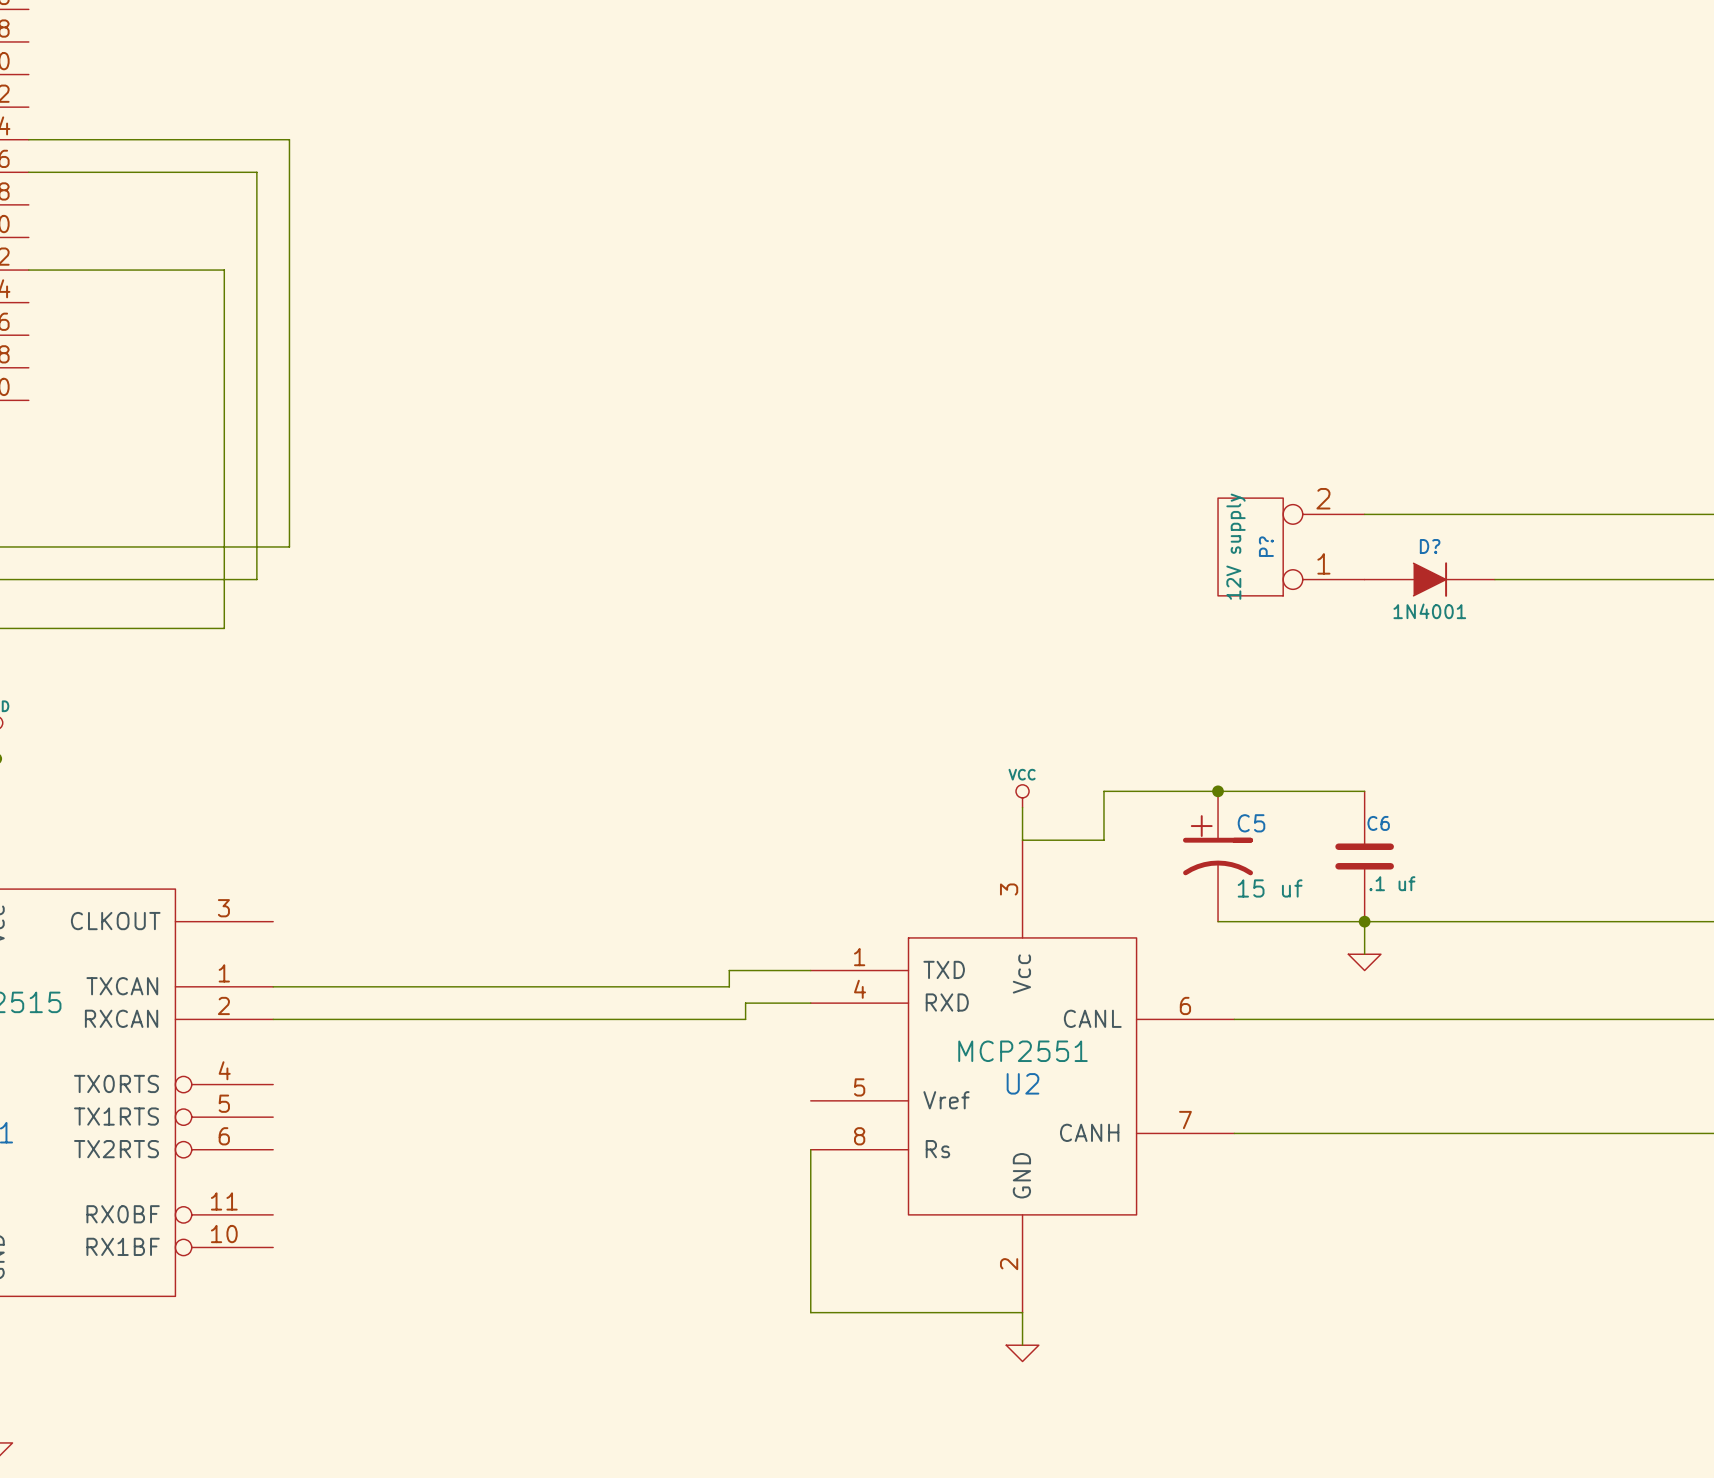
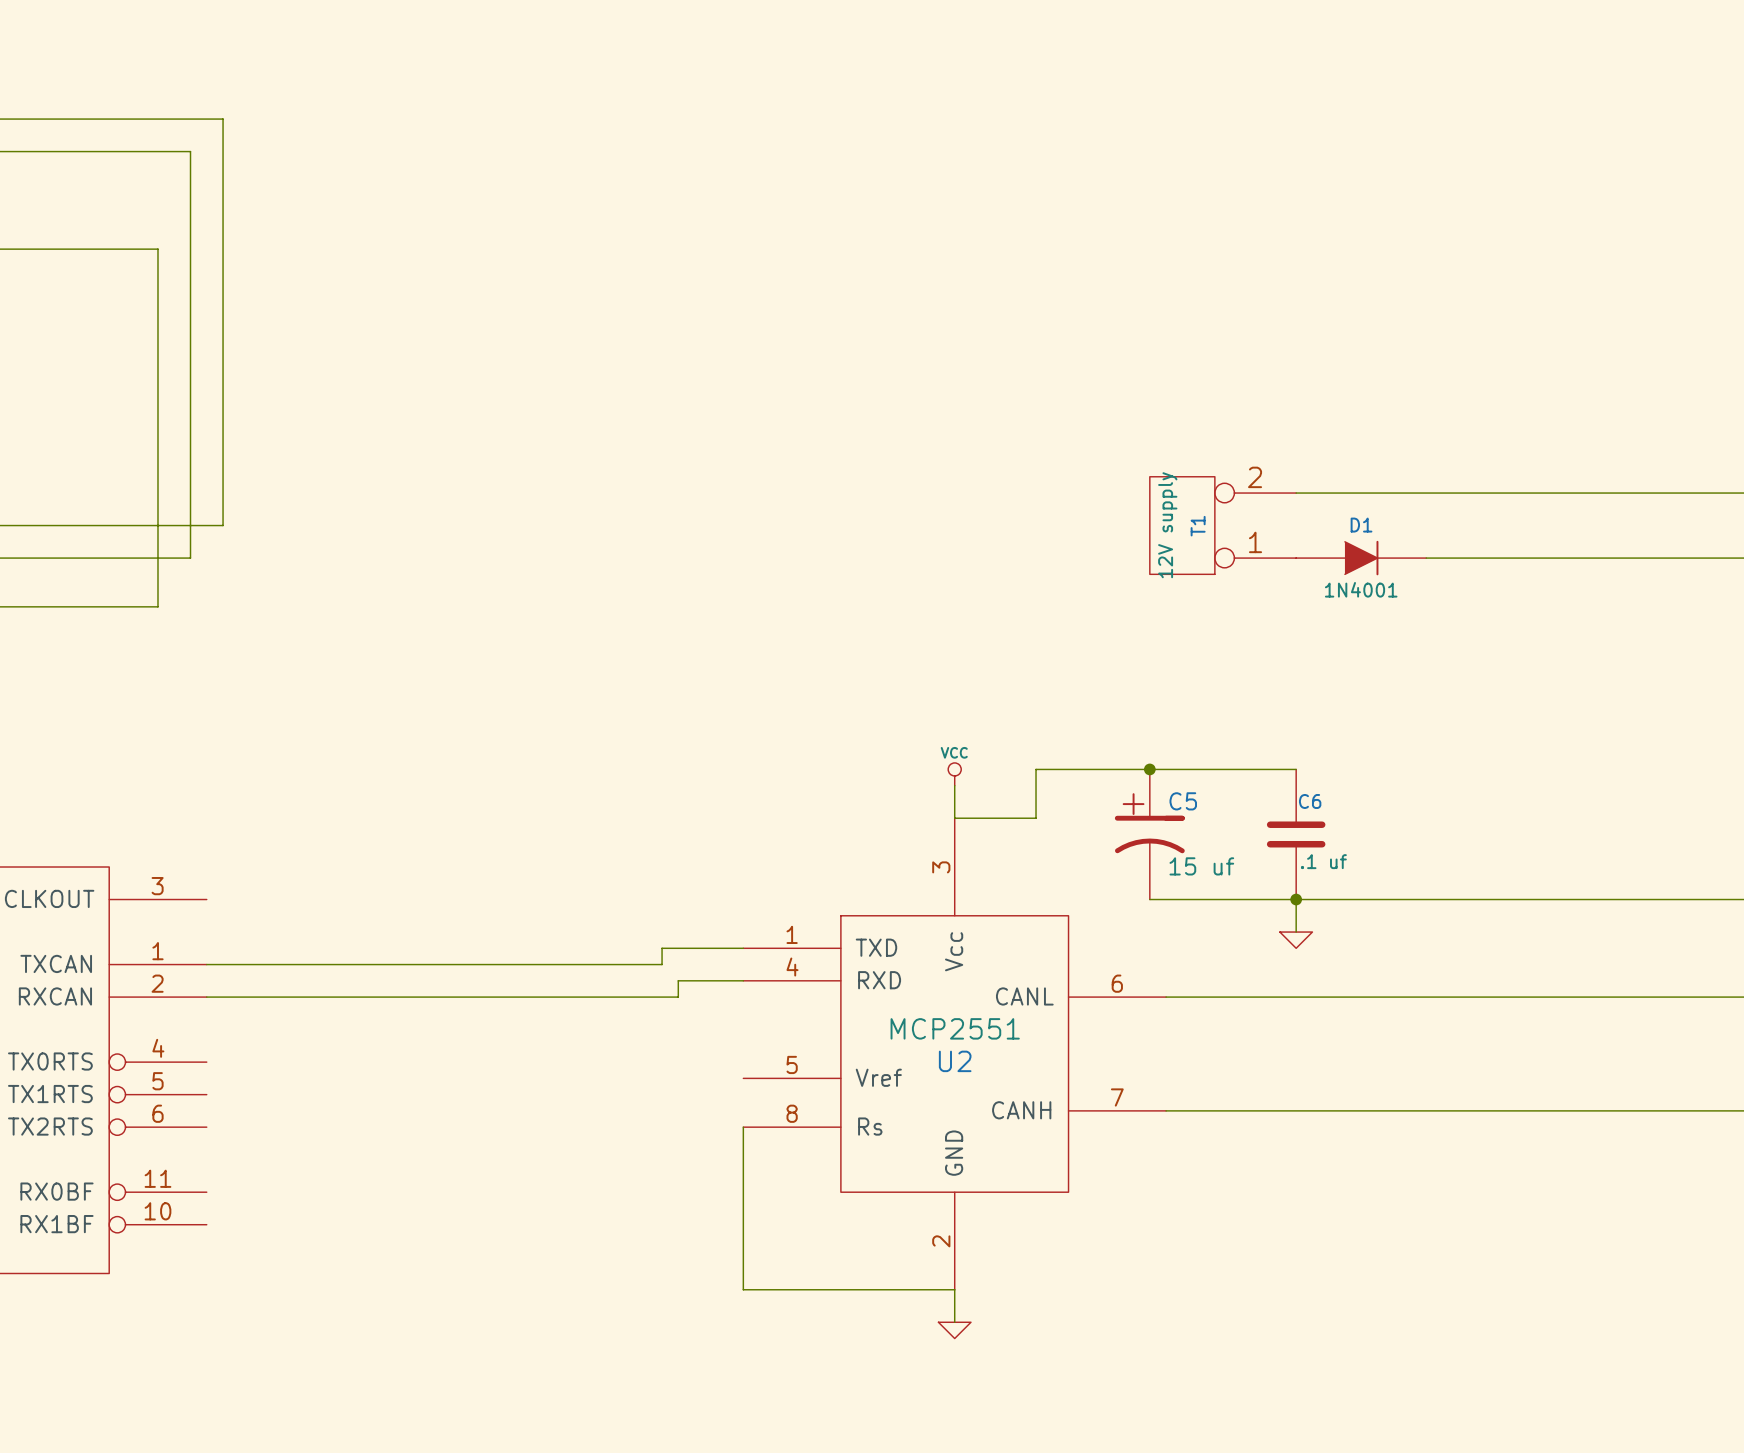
P? name: P? (1266, 546) -> T1 (1198, 526)
D? name: D? (1430, 546) -> D1 (1361, 525)

